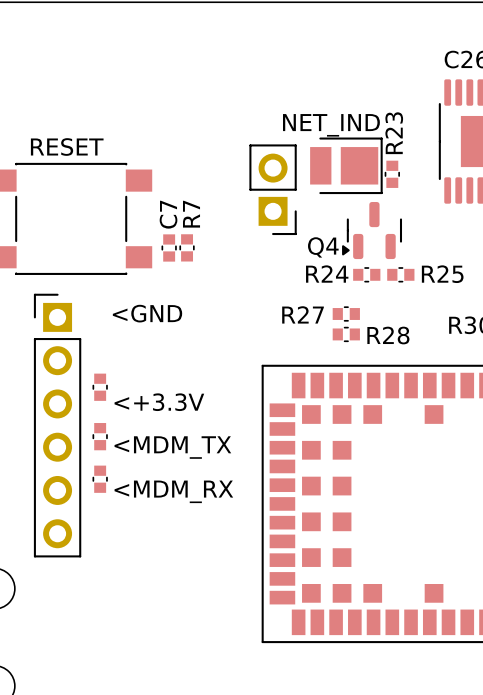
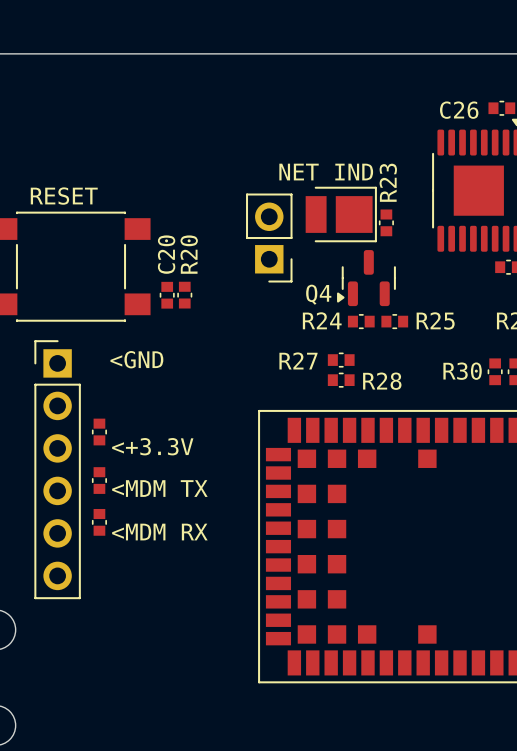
text: NET_IND (331, 125) -> NET IND (326, 172)
C7 name: C7 (168, 214) -> C20 (166, 254)
R7 name: R7 (191, 214) -> R20 (189, 254)
text: <MDM_TX (172, 447) -> <MDM TX (159, 488)
text: <MDM_RX (173, 491) -> <MDM RX (159, 532)

